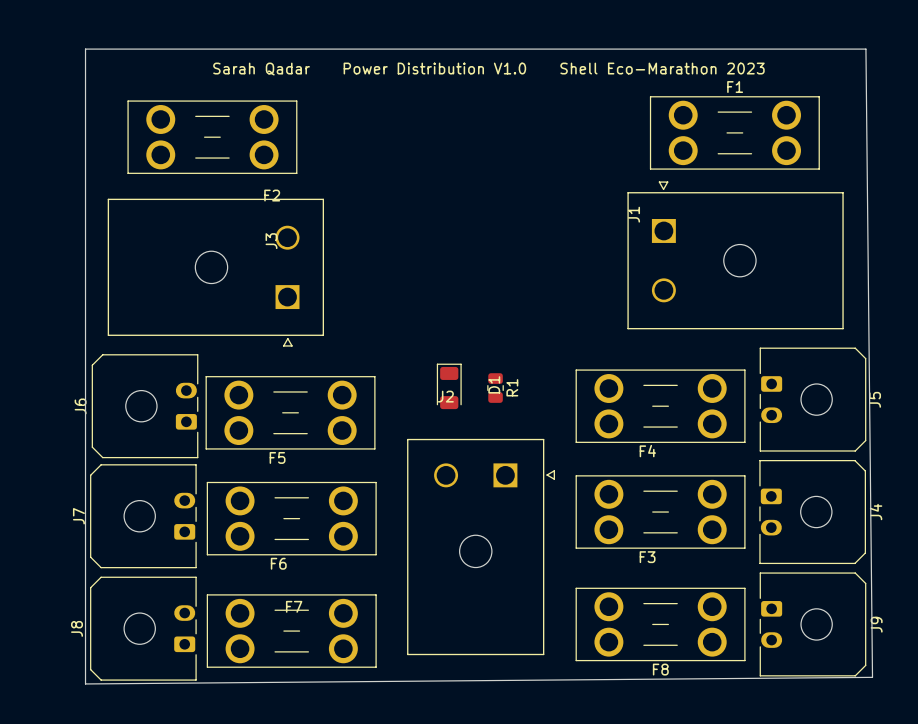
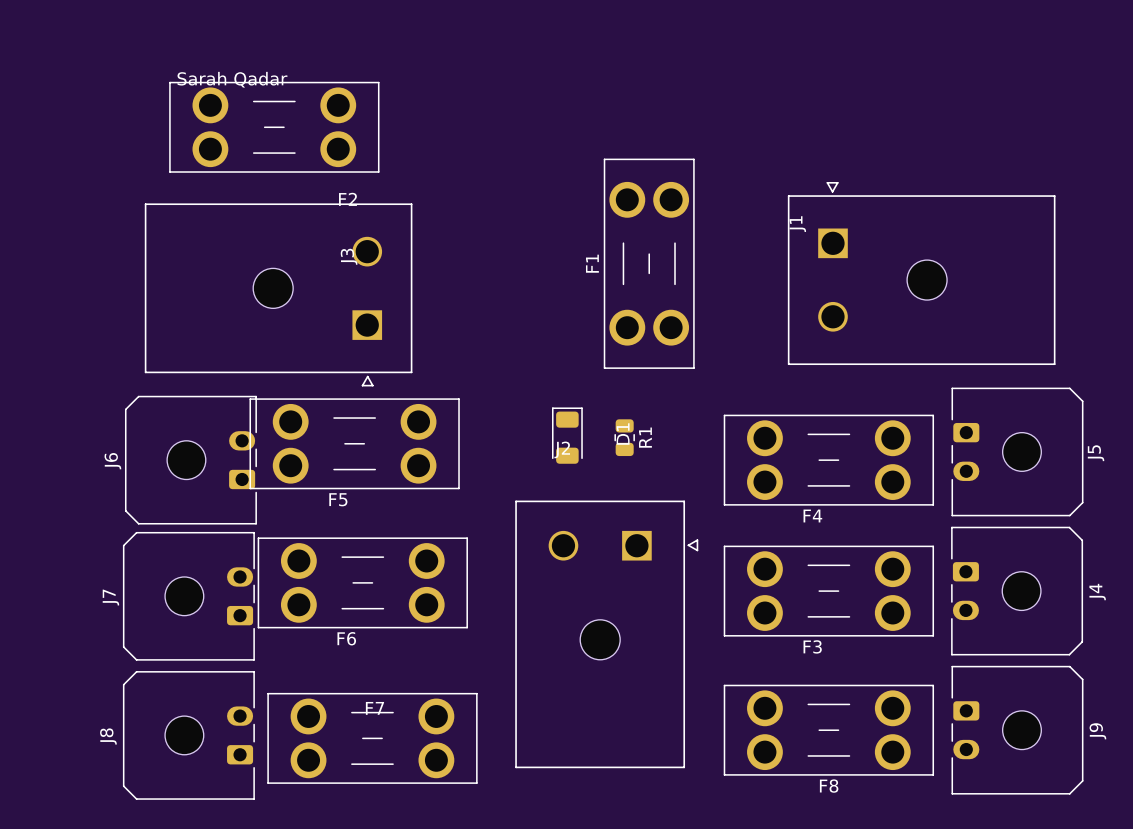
board edge: (85, 49) (85, 683) (872, 677) (865, 49) (85, 49) -> none
text: Sarah Qadar Power Distribution V1.0 Shell Eco-Marathon 2023 (488, 69) -> none
F1 name position: F1 (735, 87) -> F1 (592, 263)
text: none -> Sarah Qadar (232, 79)
F1 rotation: 0° (734, 132) -> 90° clockwise (649, 263)
F1 position: (734, 132) -> (649, 263)
F5 position: (290, 412) -> (354, 443)
F6 position: (291, 518) -> (362, 582)

